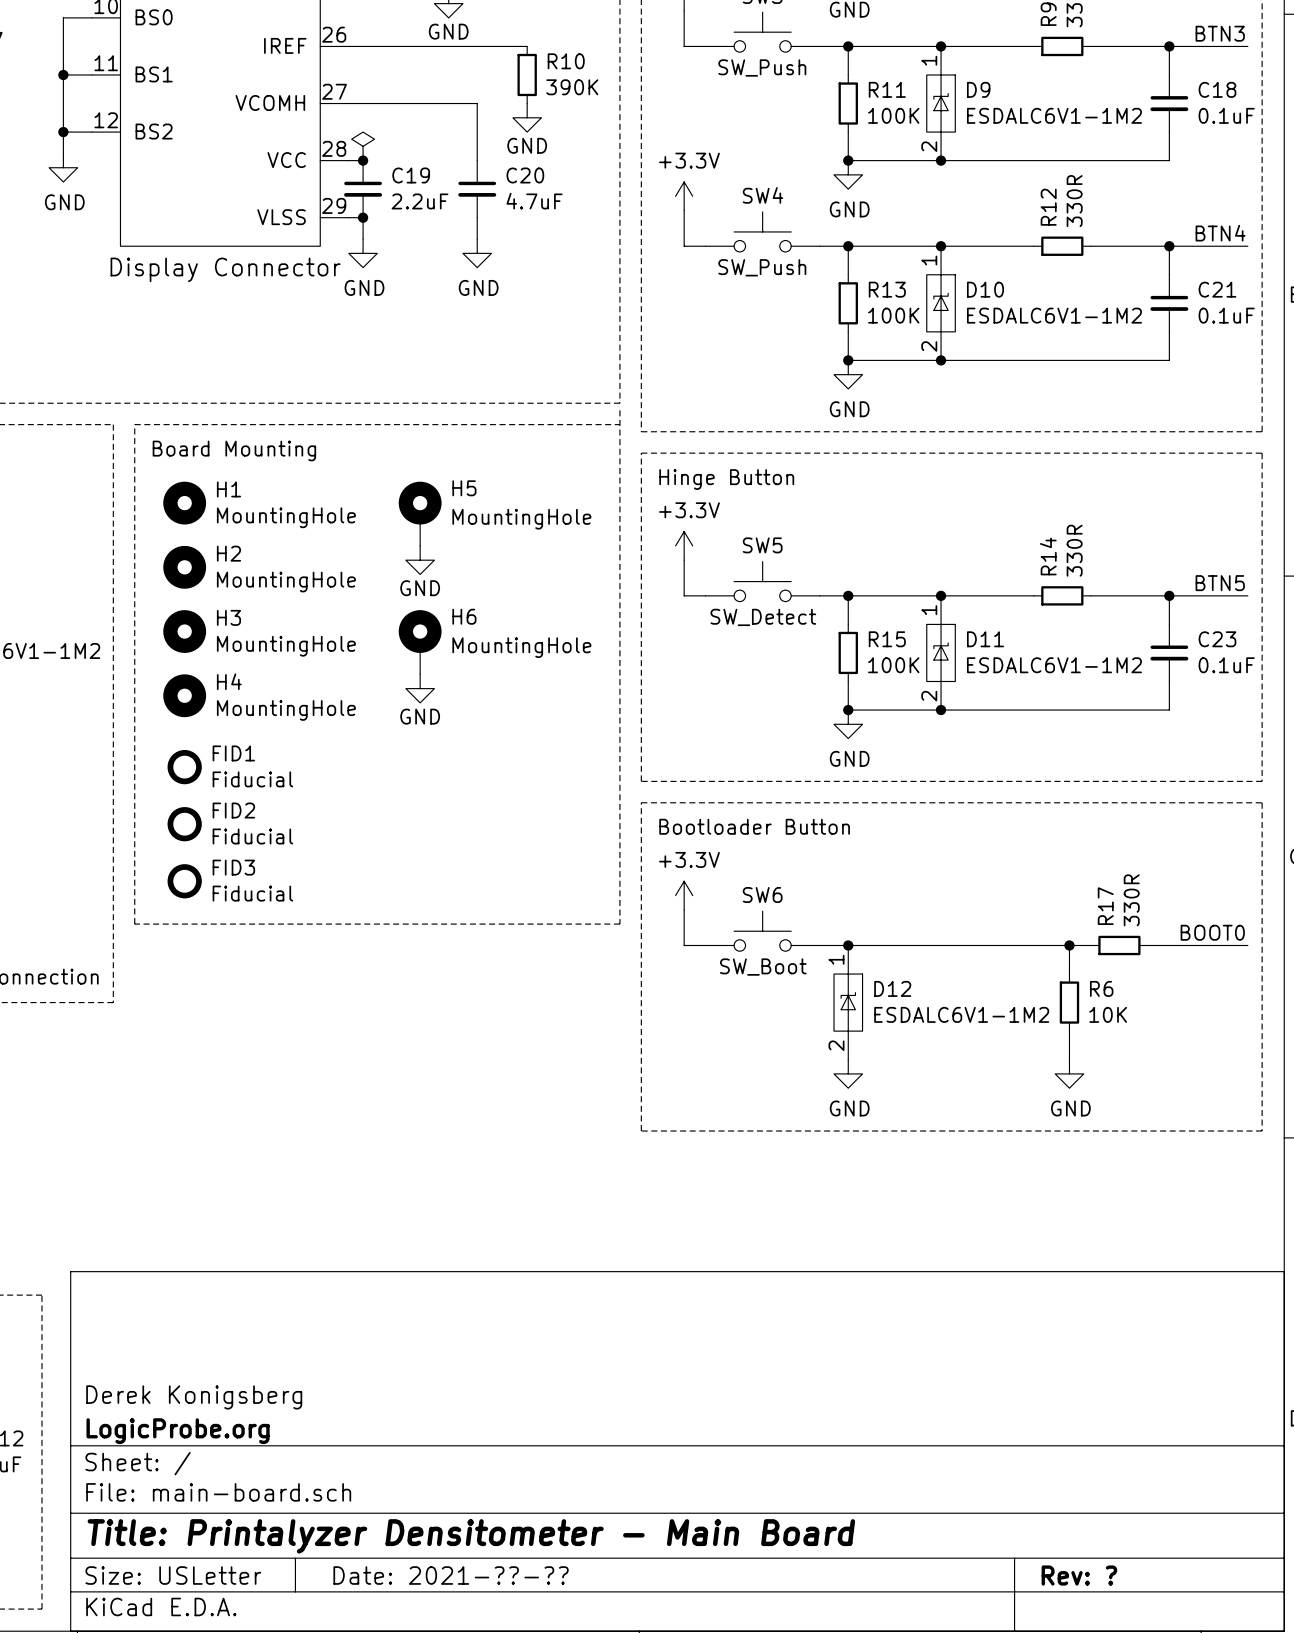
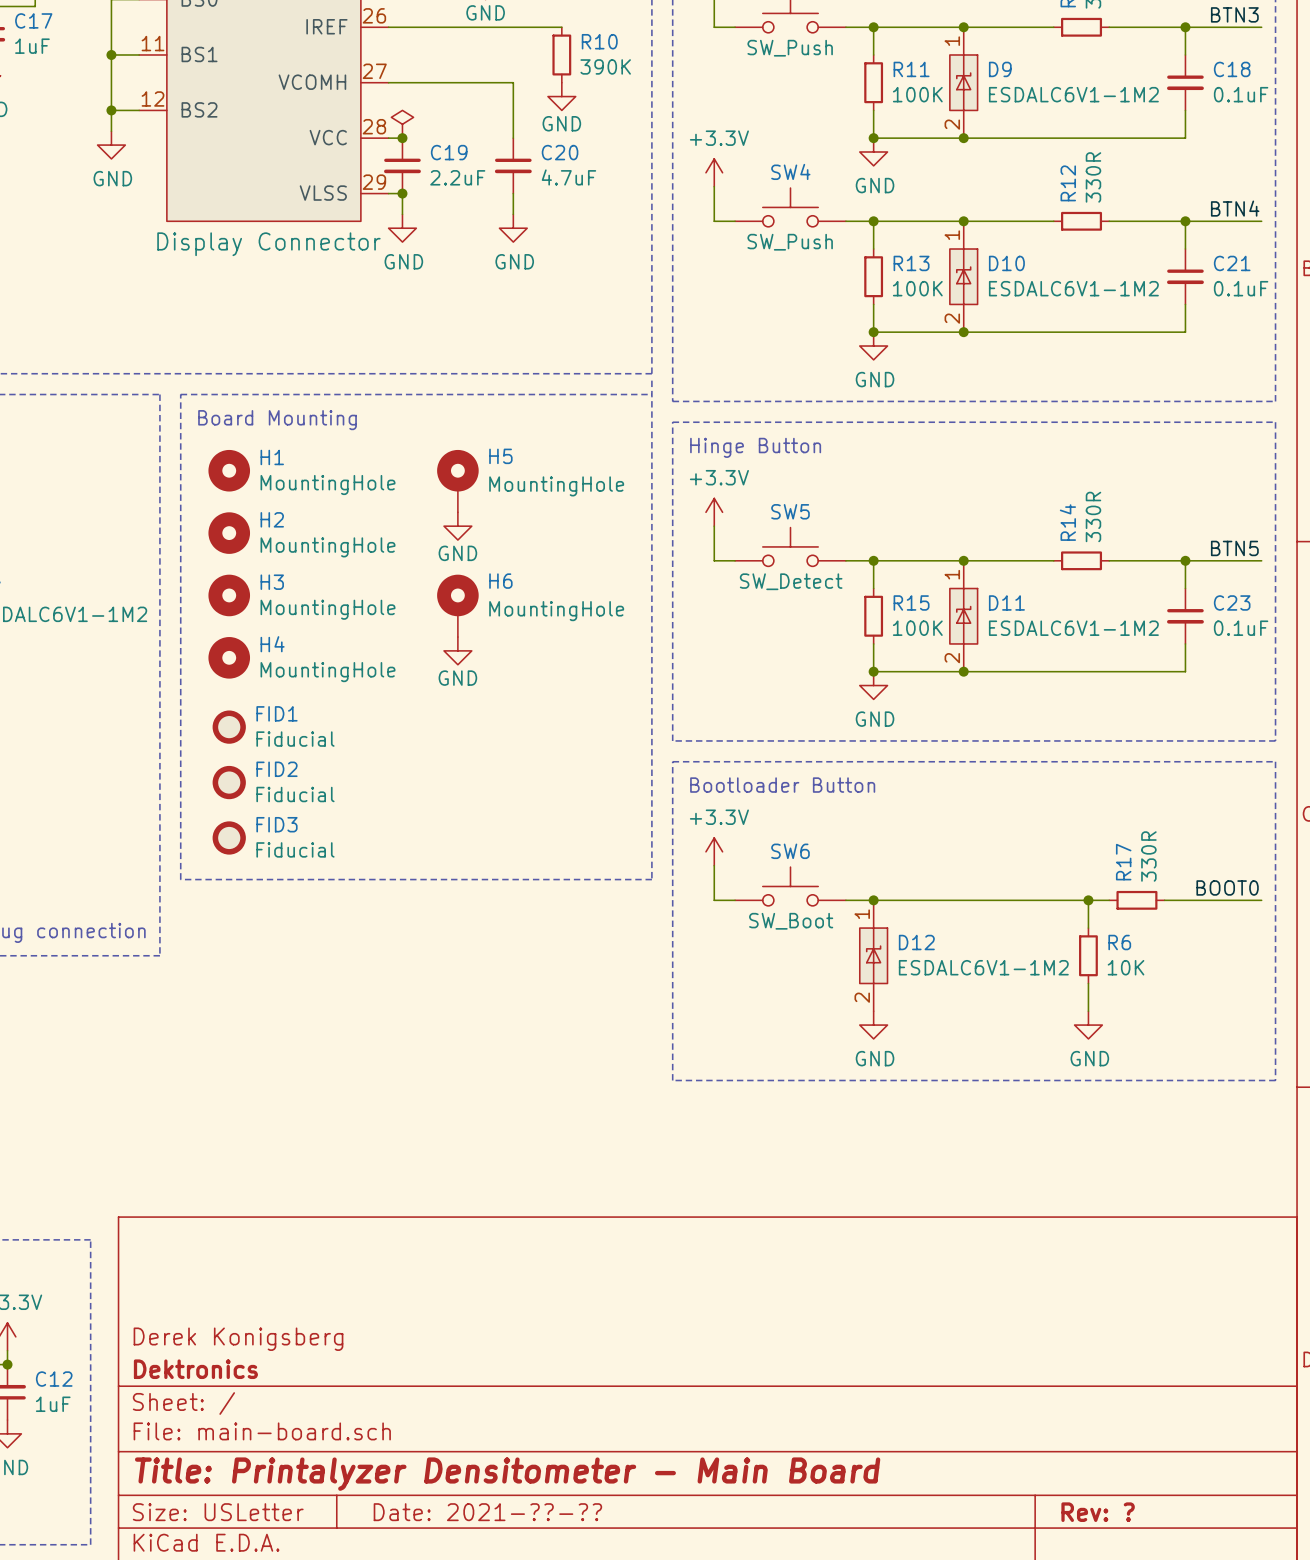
title block: LogicProbe.org (178, 1431) -> Dektronics (195, 1369)

